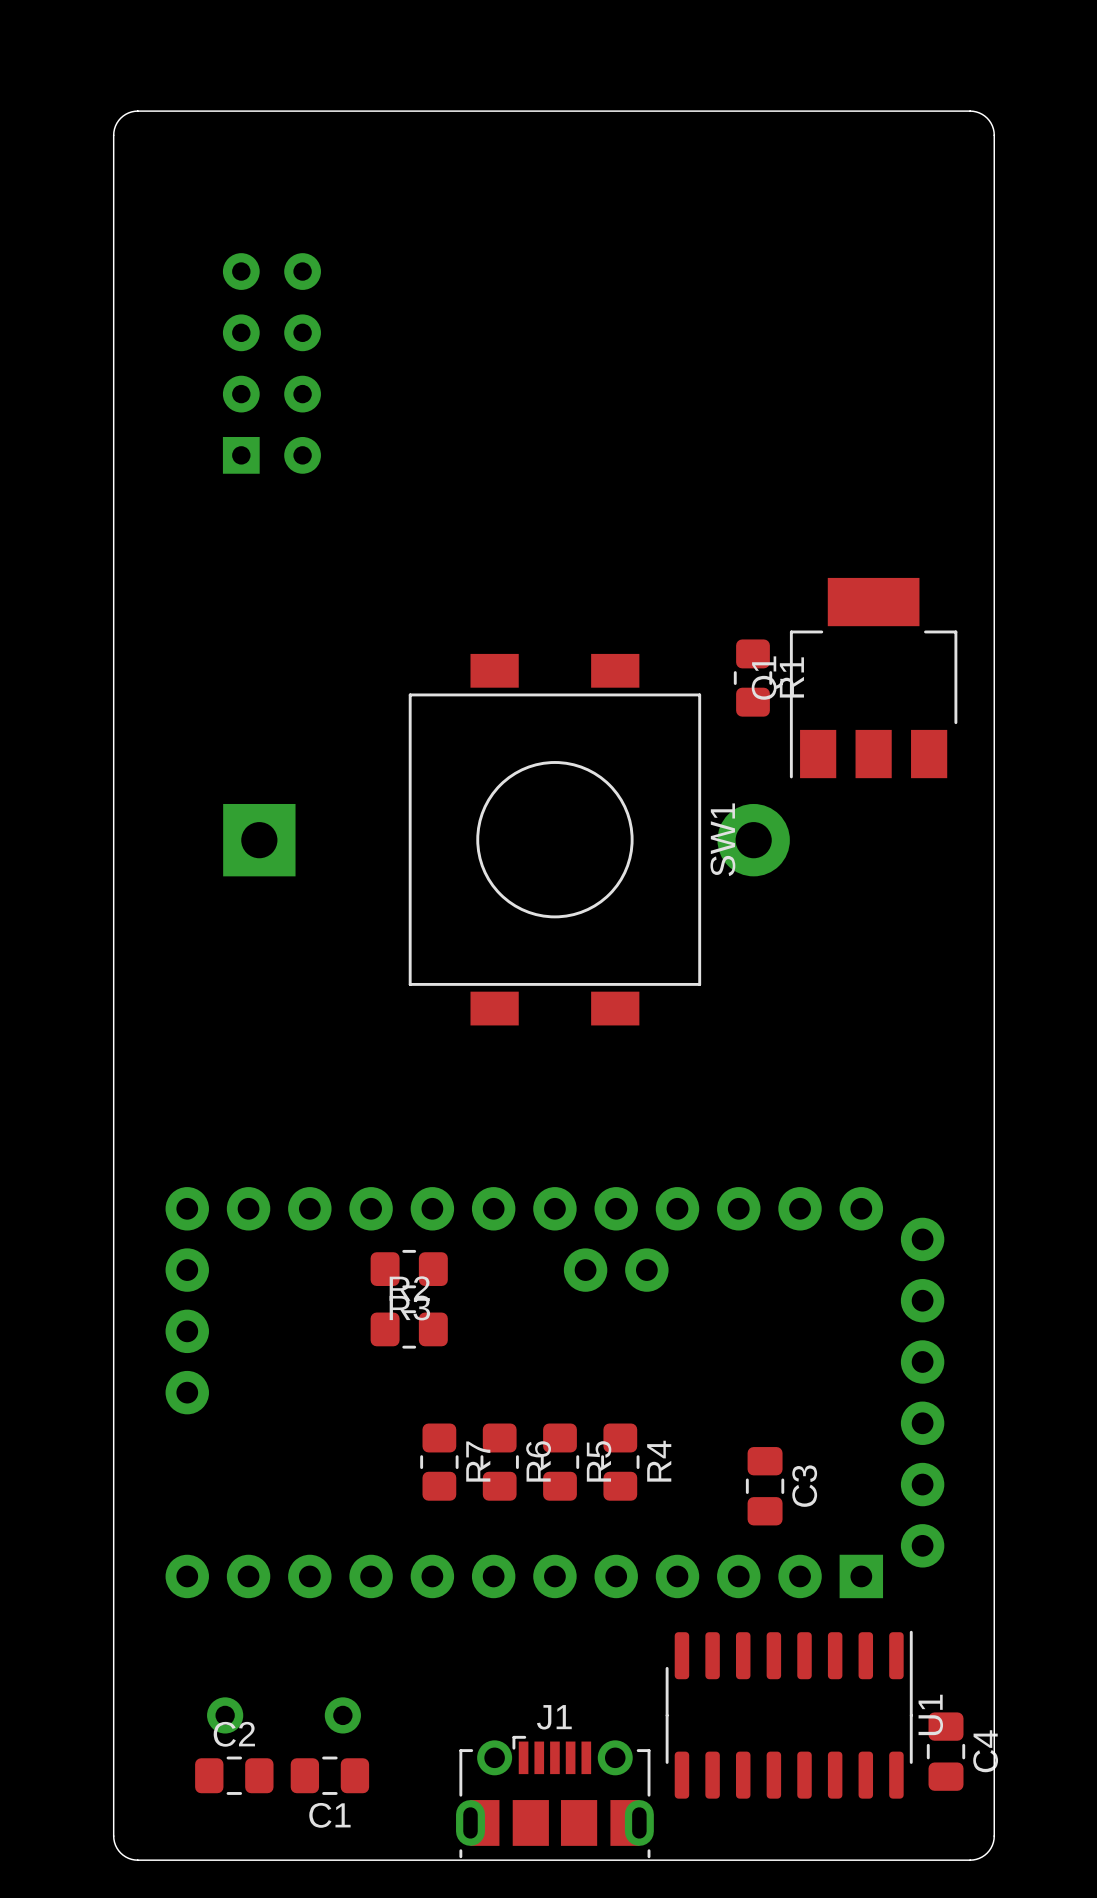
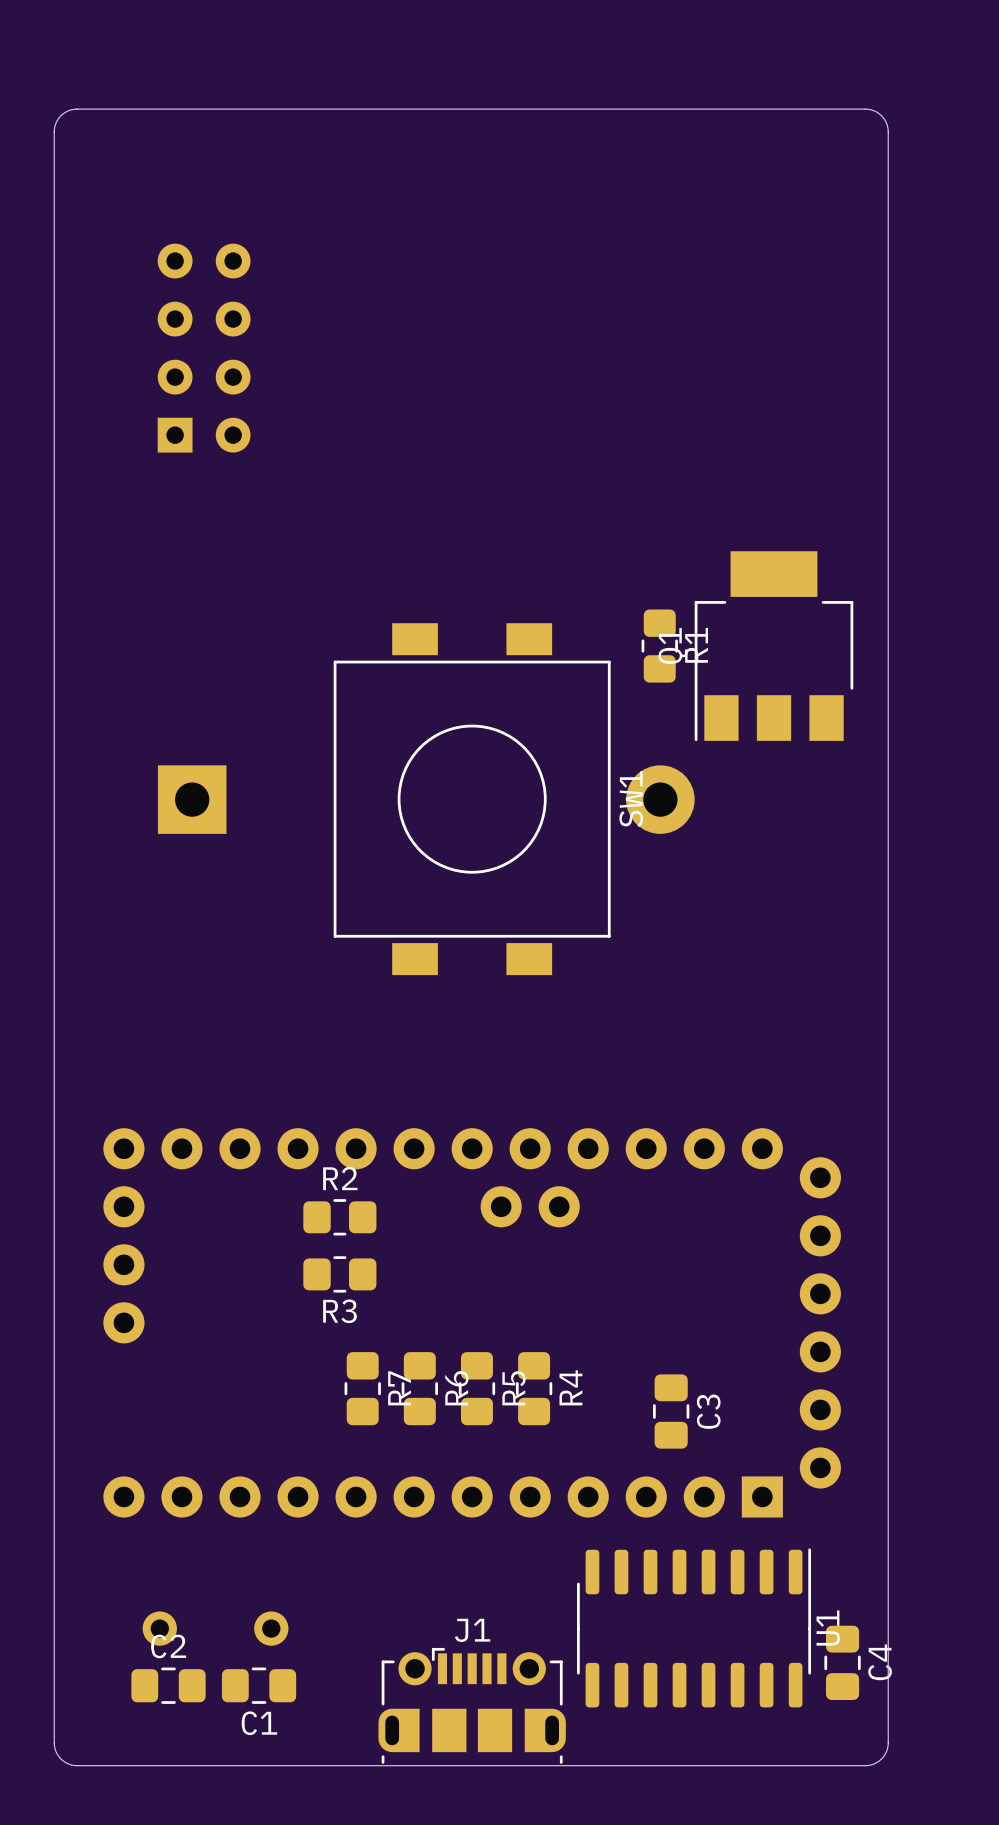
R3 position: (409, 1269) -> (339, 1274)
R2 position: (409, 1329) -> (339, 1217)

